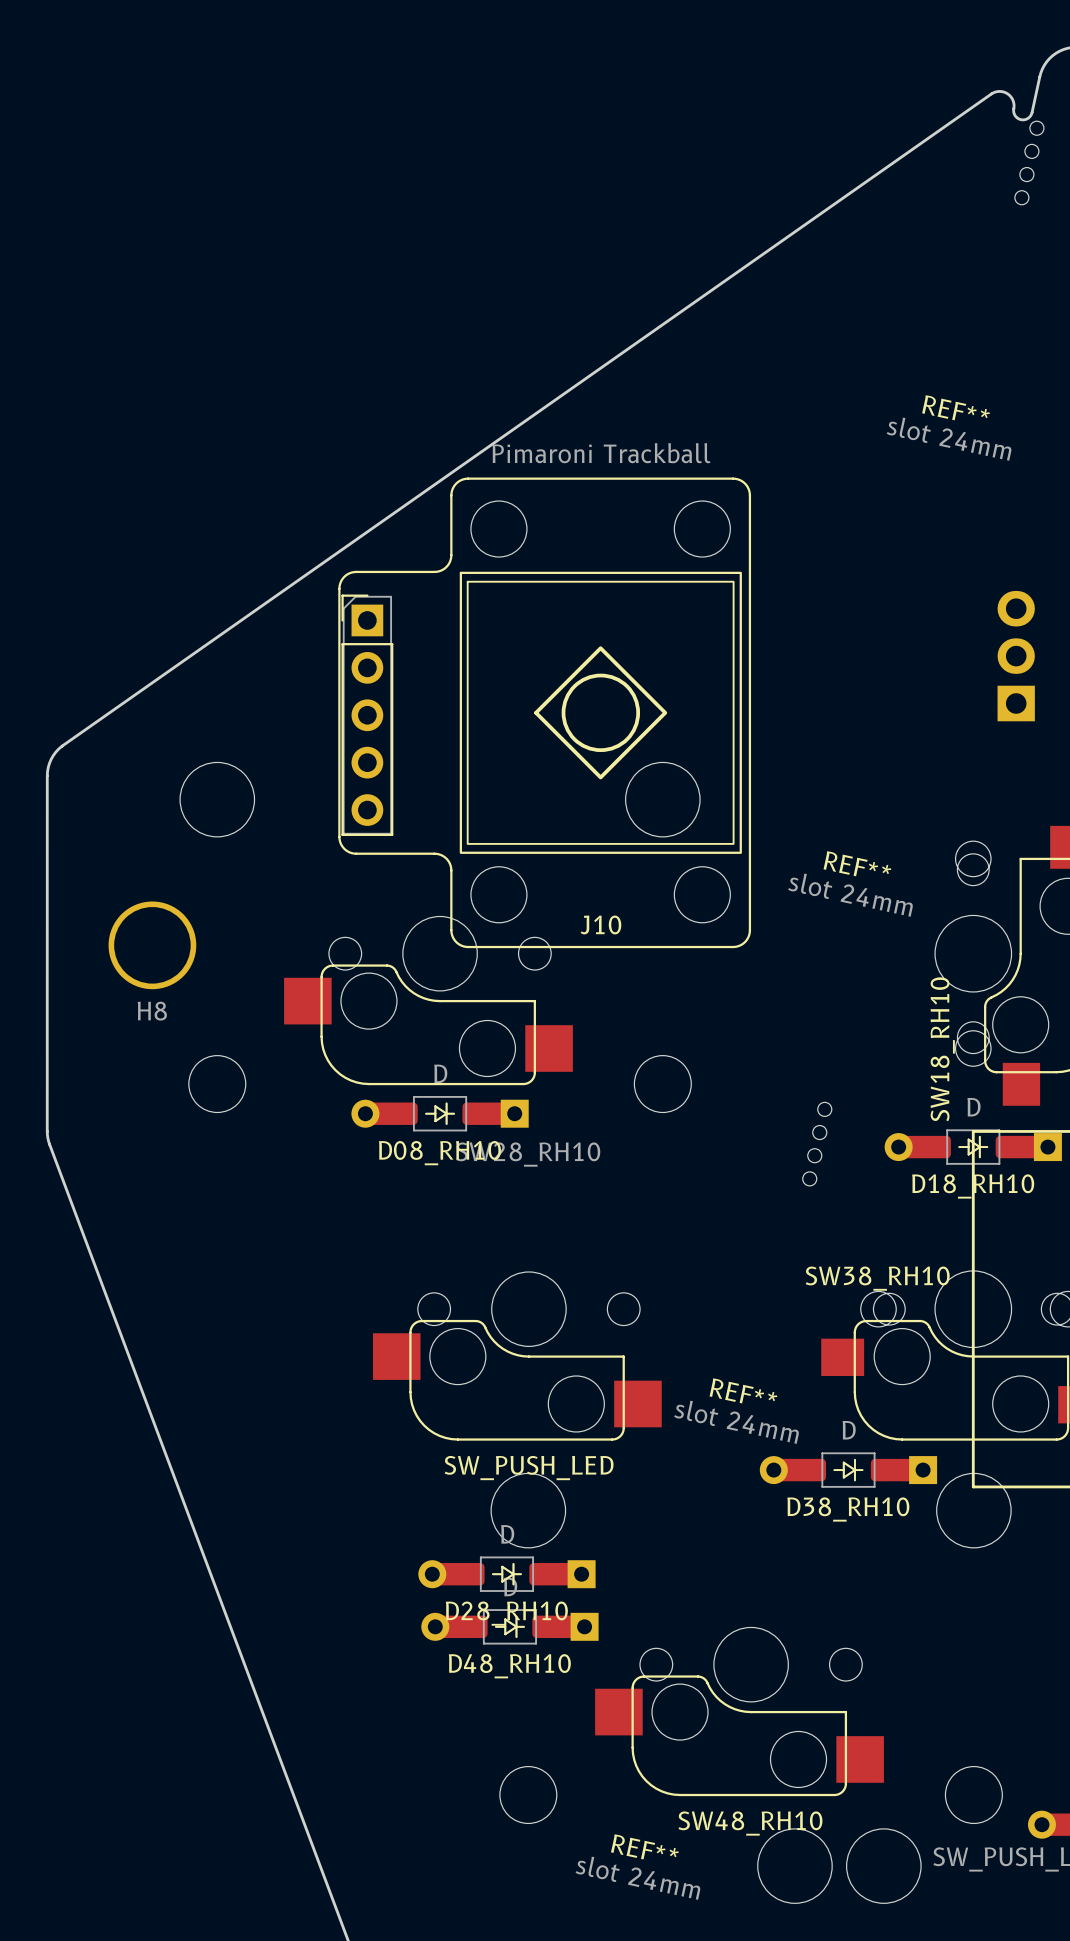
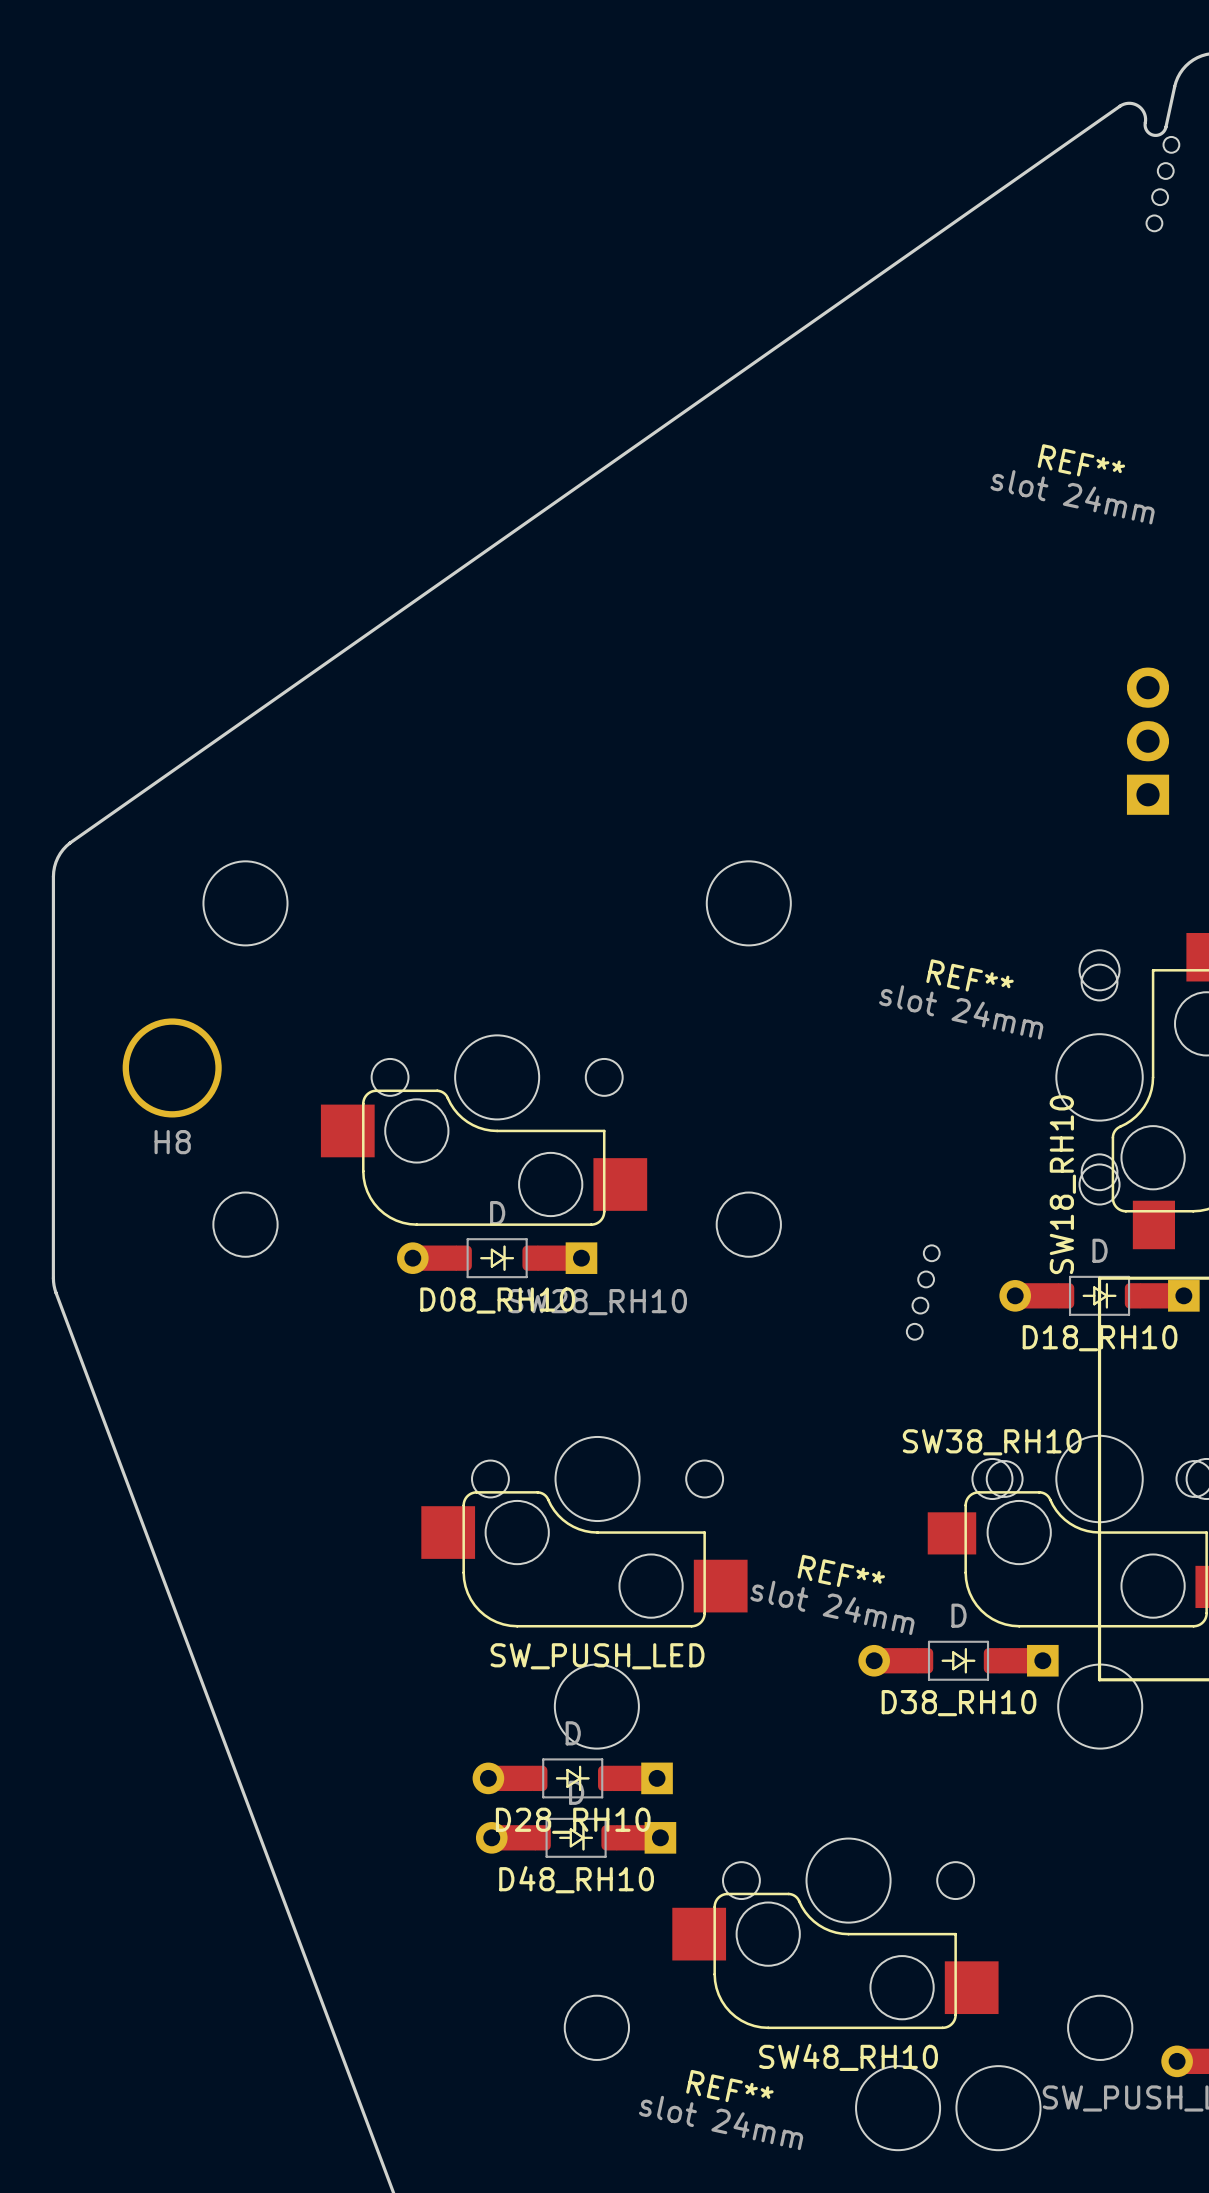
J10: Pimaroni Trackball (544, 712) -> none

